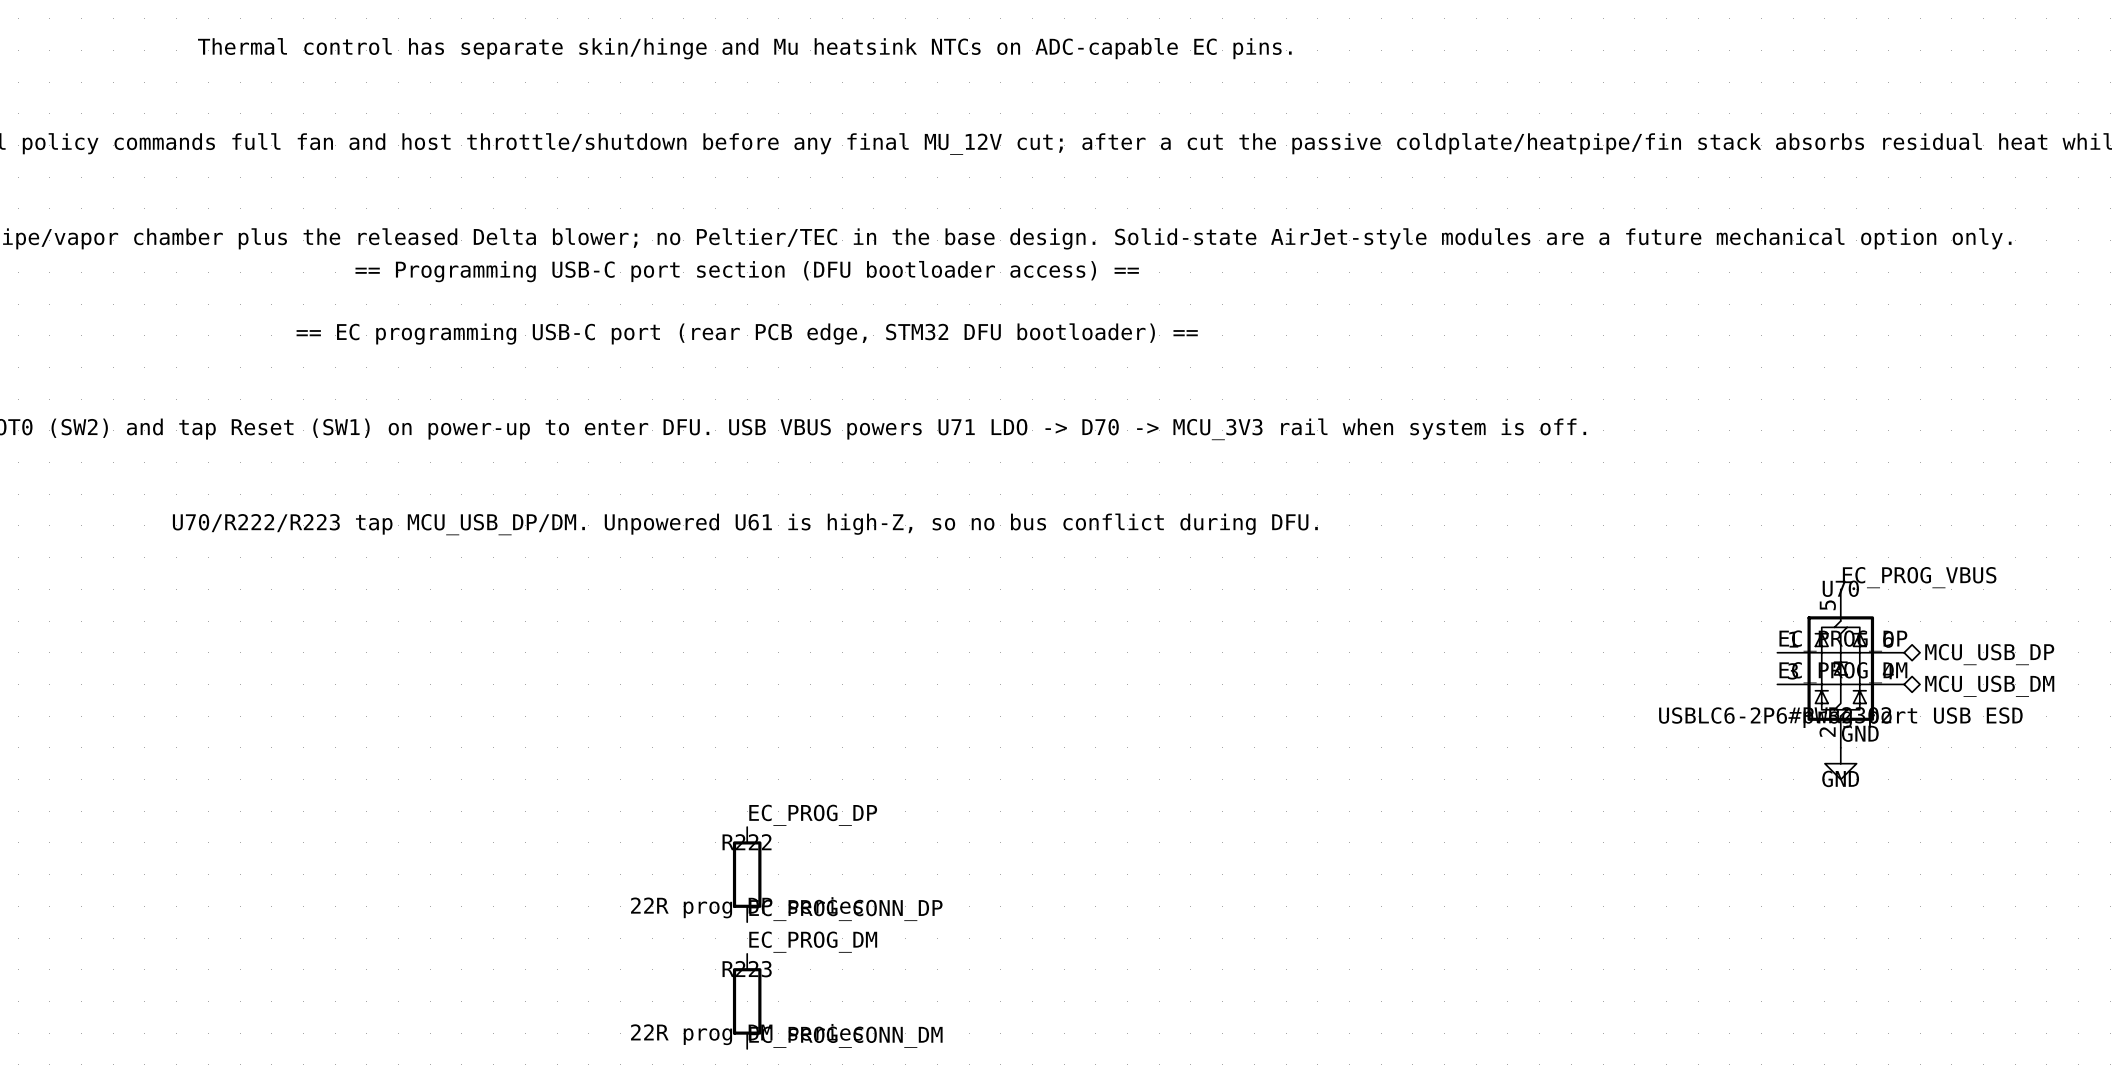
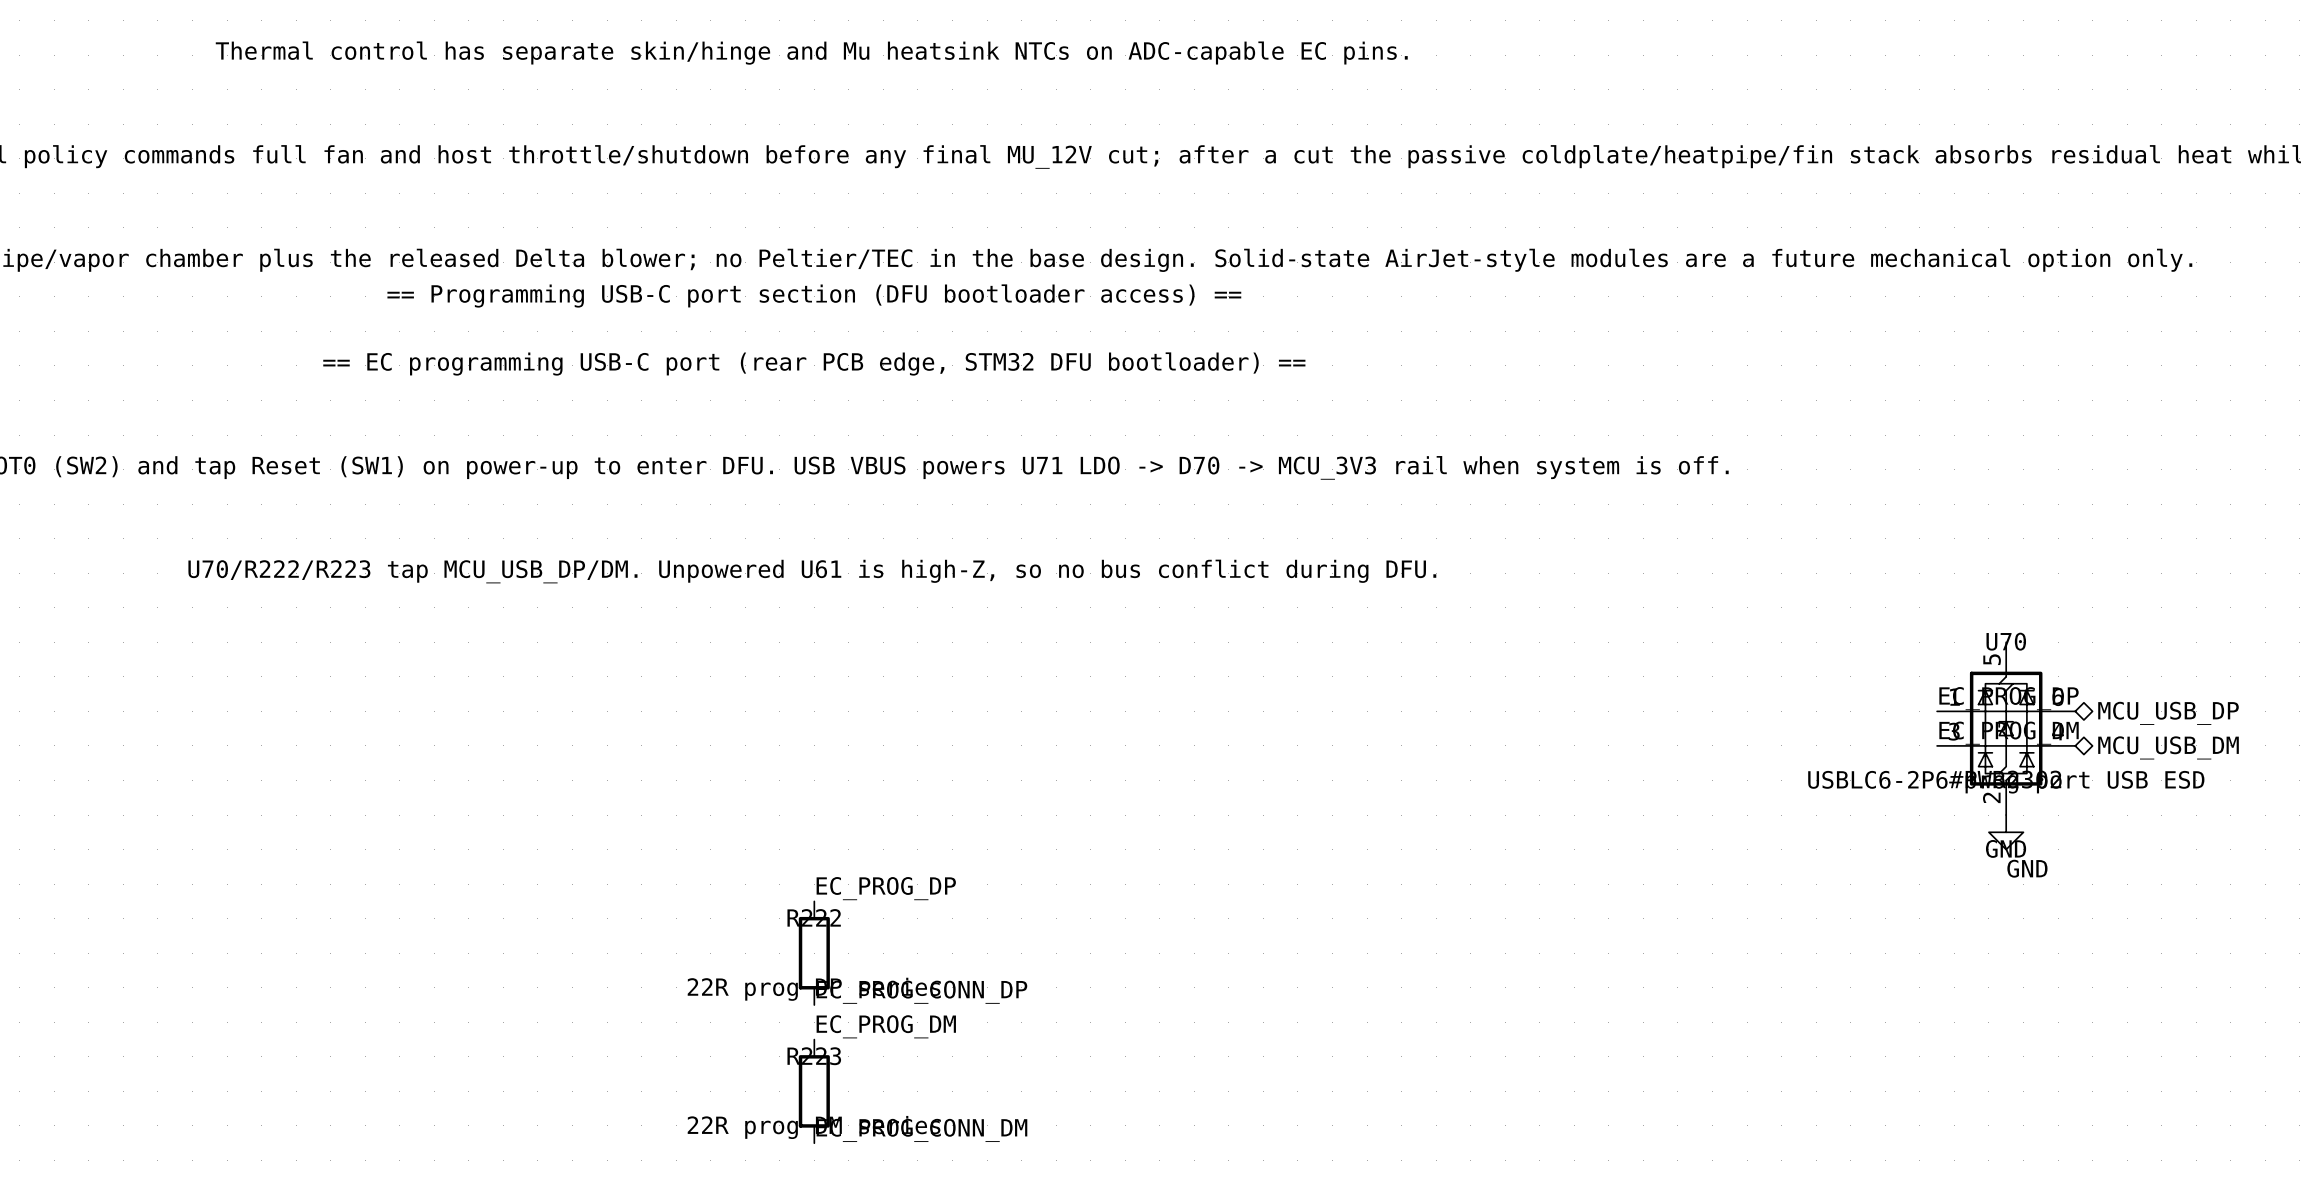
label: EC_PROG_VBUS (1919, 577) -> none
label position: GND (1860, 733) -> GND (2027, 868)

